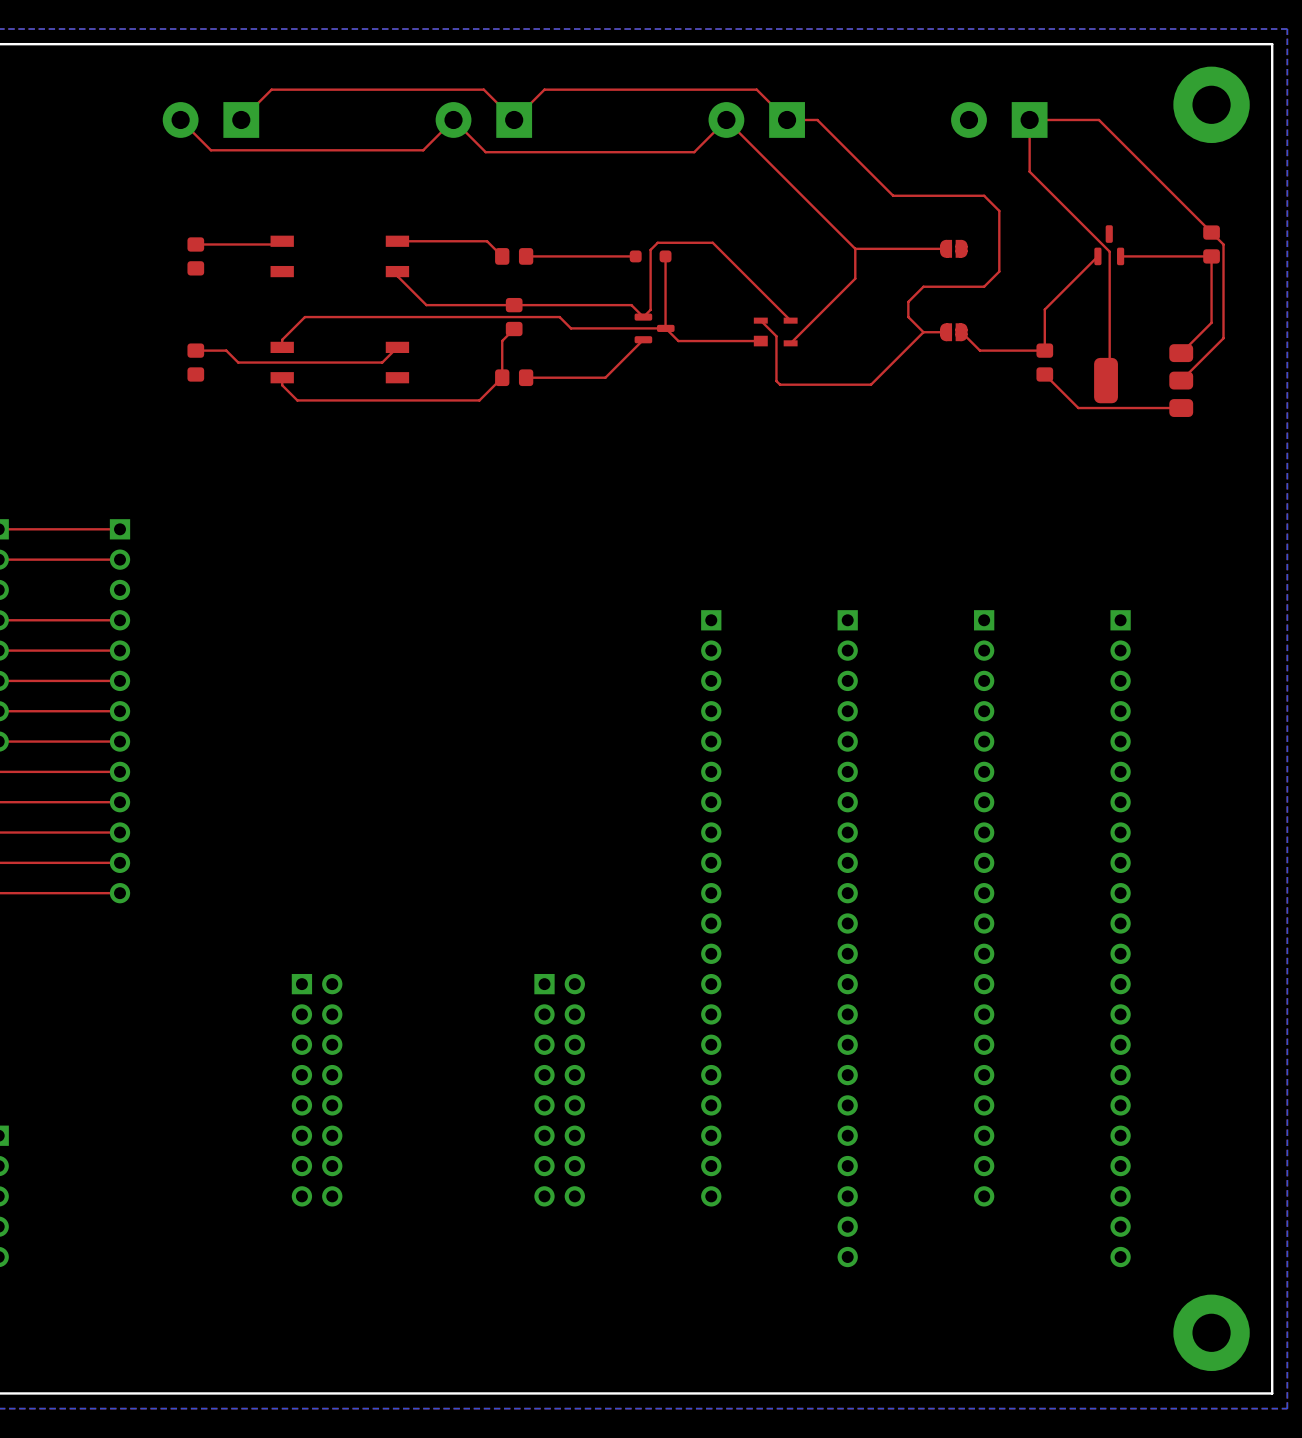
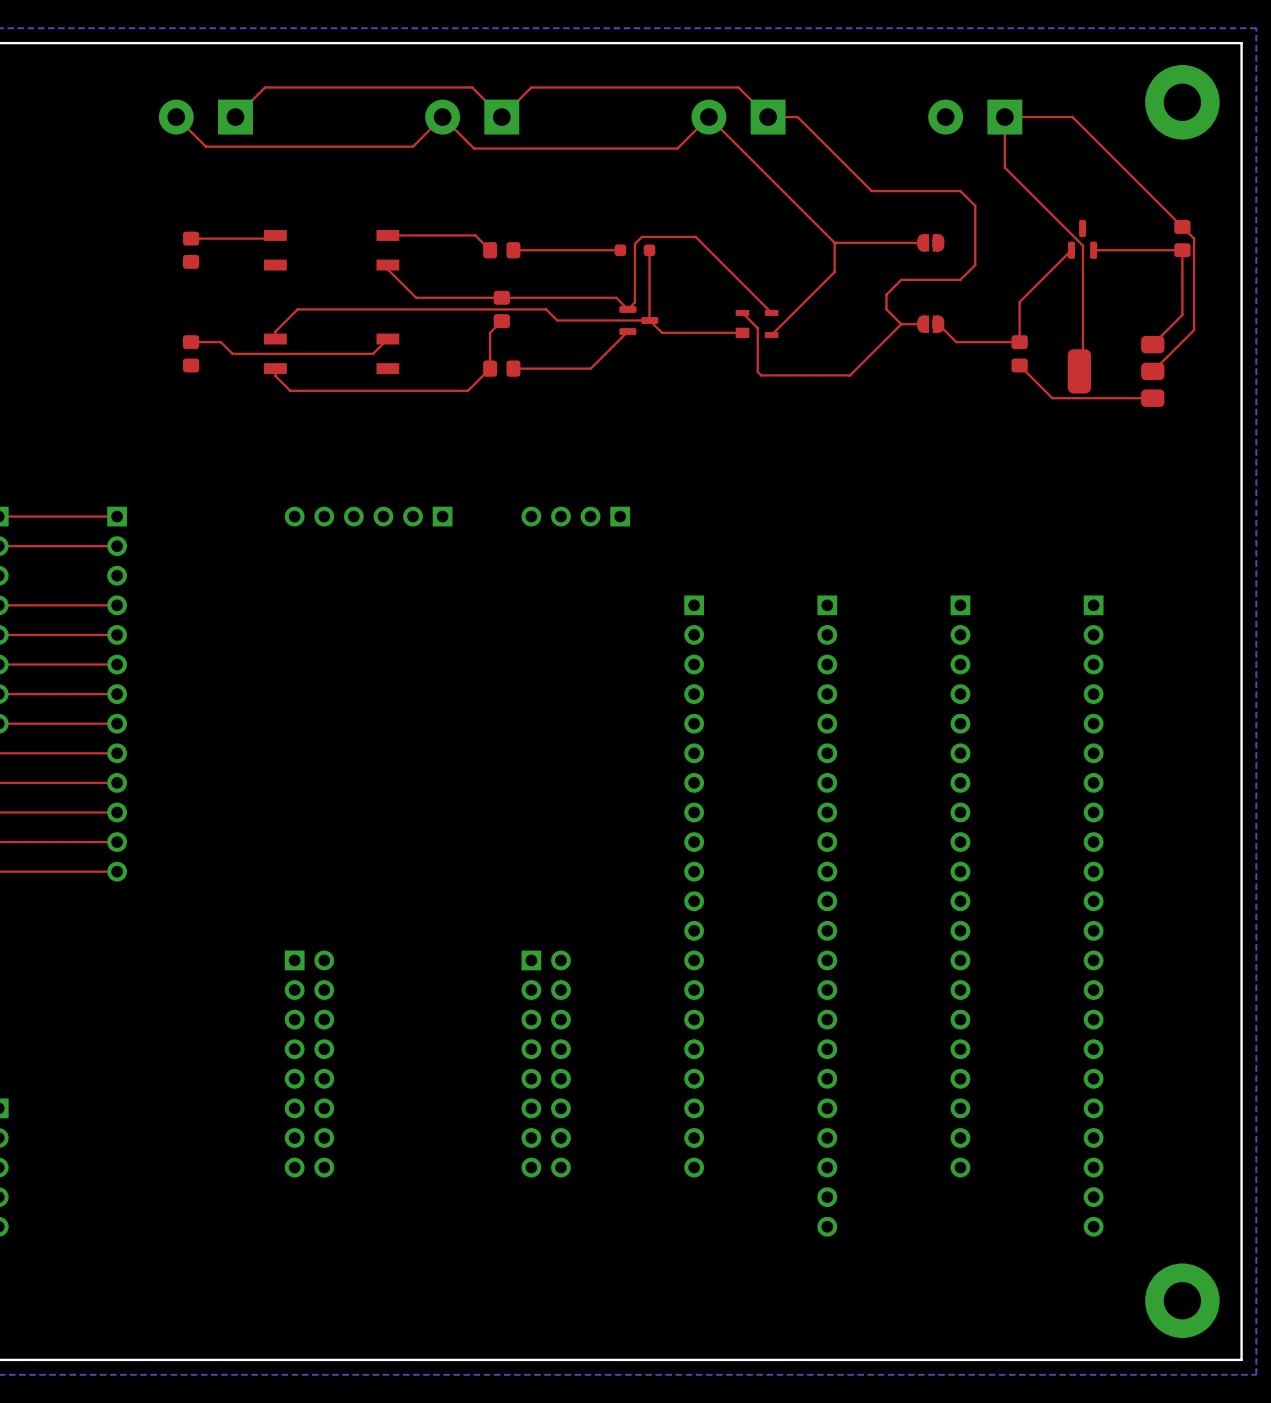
part: none -> (368, 516)
part: none -> (575, 516)

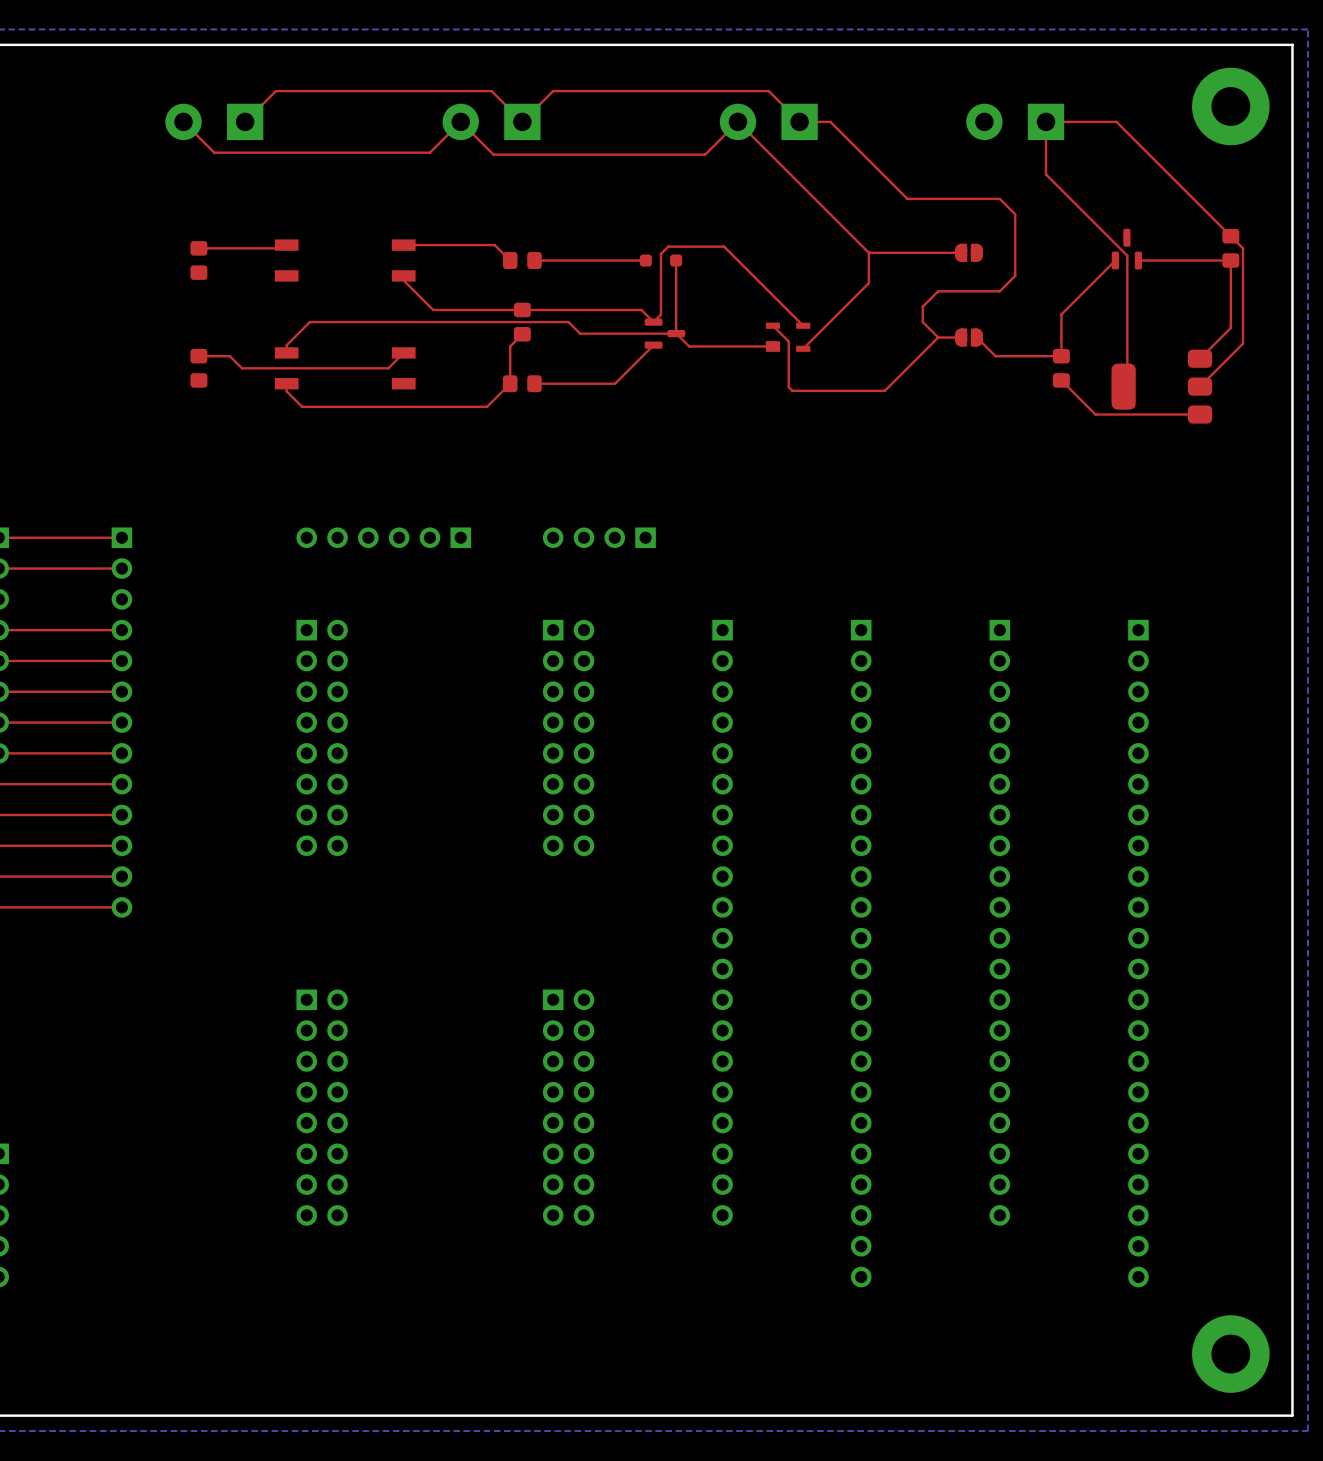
part: none -> (322, 737)
part: none -> (568, 737)

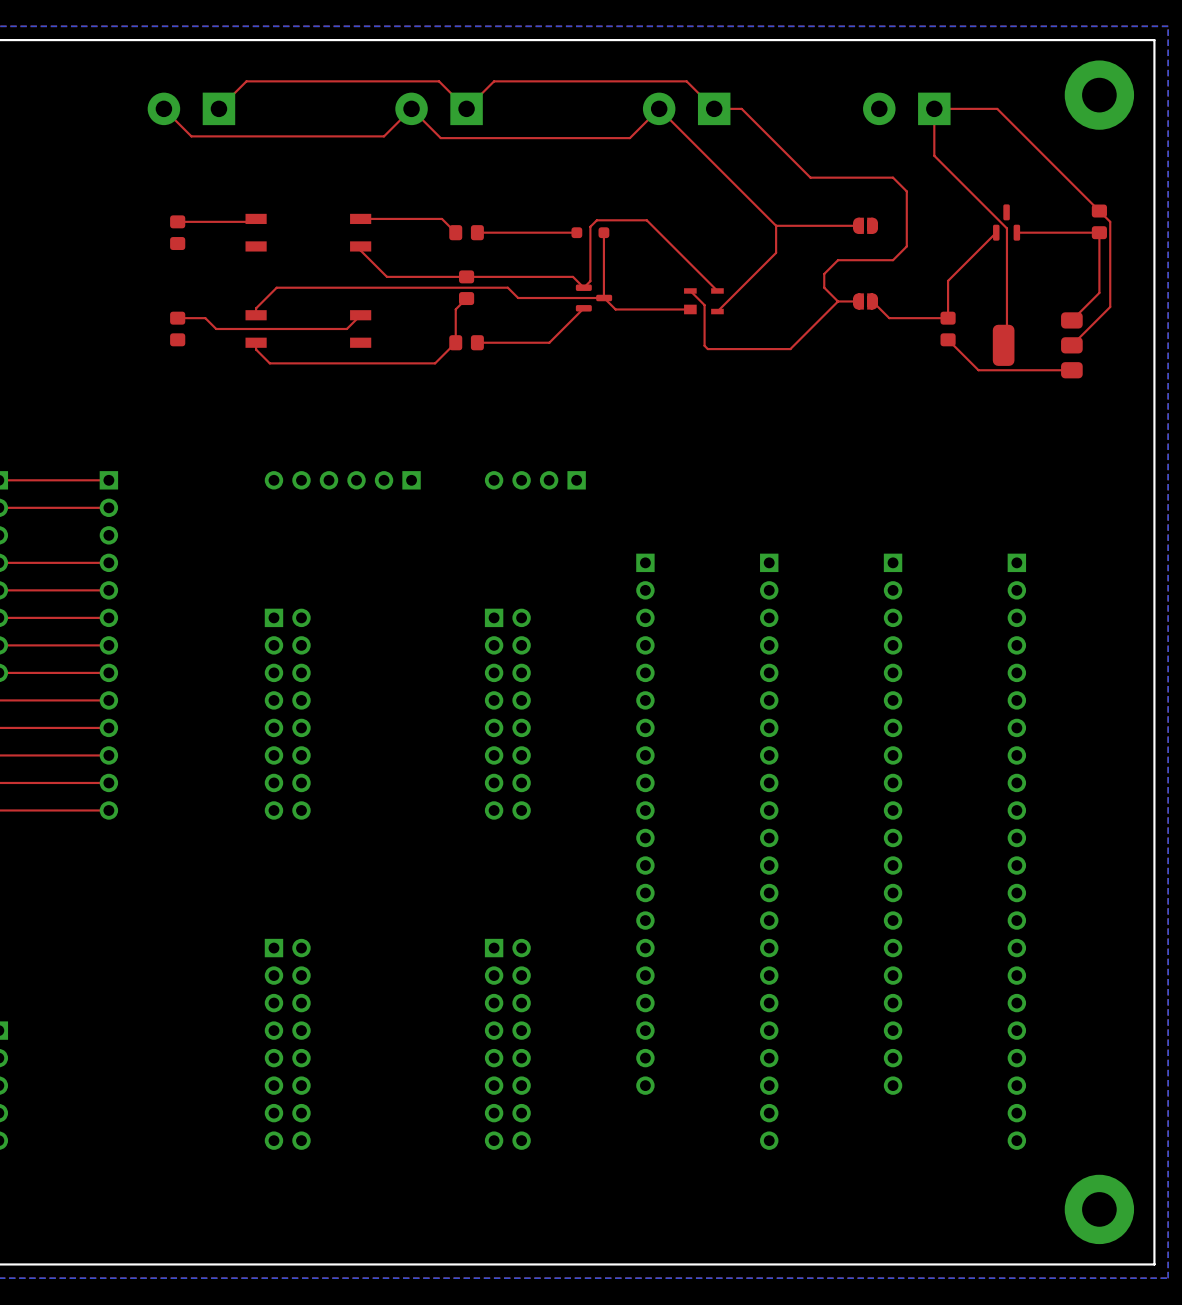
part position: (322, 737) -> (287, 714)
part position: (568, 737) -> (507, 714)
part position: (322, 1107) -> (287, 1044)
part position: (568, 1107) -> (507, 1044)

